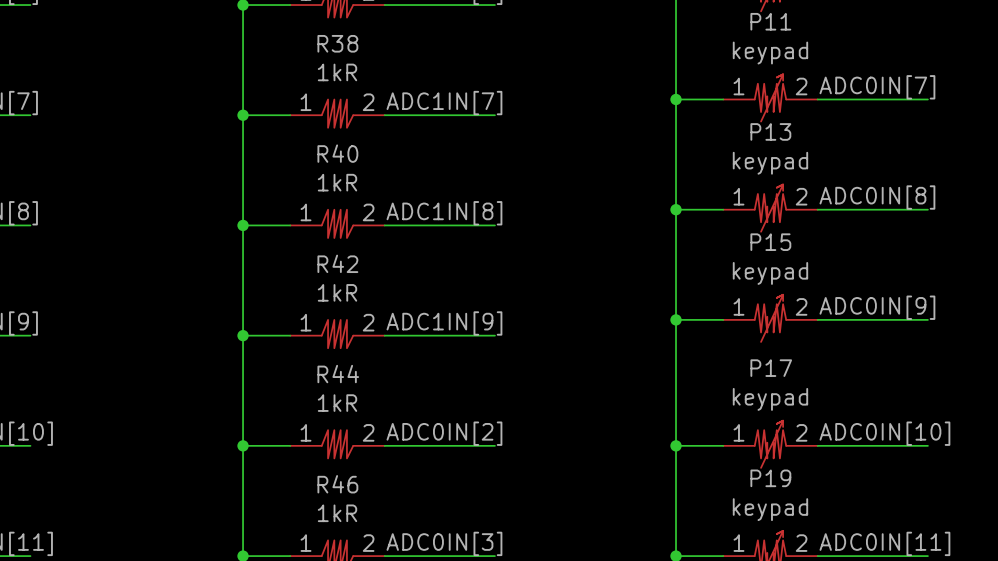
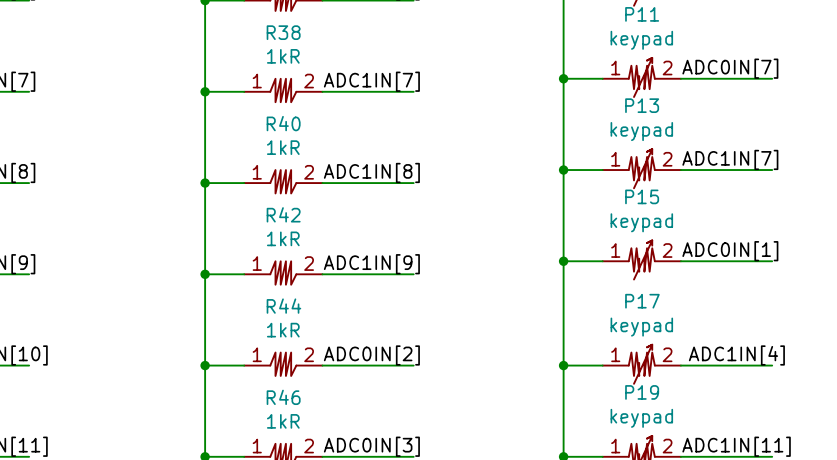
label: ADC0IN[8] (877, 197) -> ADC1IN[7] (730, 159)
label: ADC0IN[9] (877, 307) -> ADC0IN[1] (730, 251)
label: ADC0IN[10] (884, 433) -> ADC1IN[4] (736, 355)
label: ADC0IN[11] (884, 543) -> ADC1IN[11] (736, 446)

